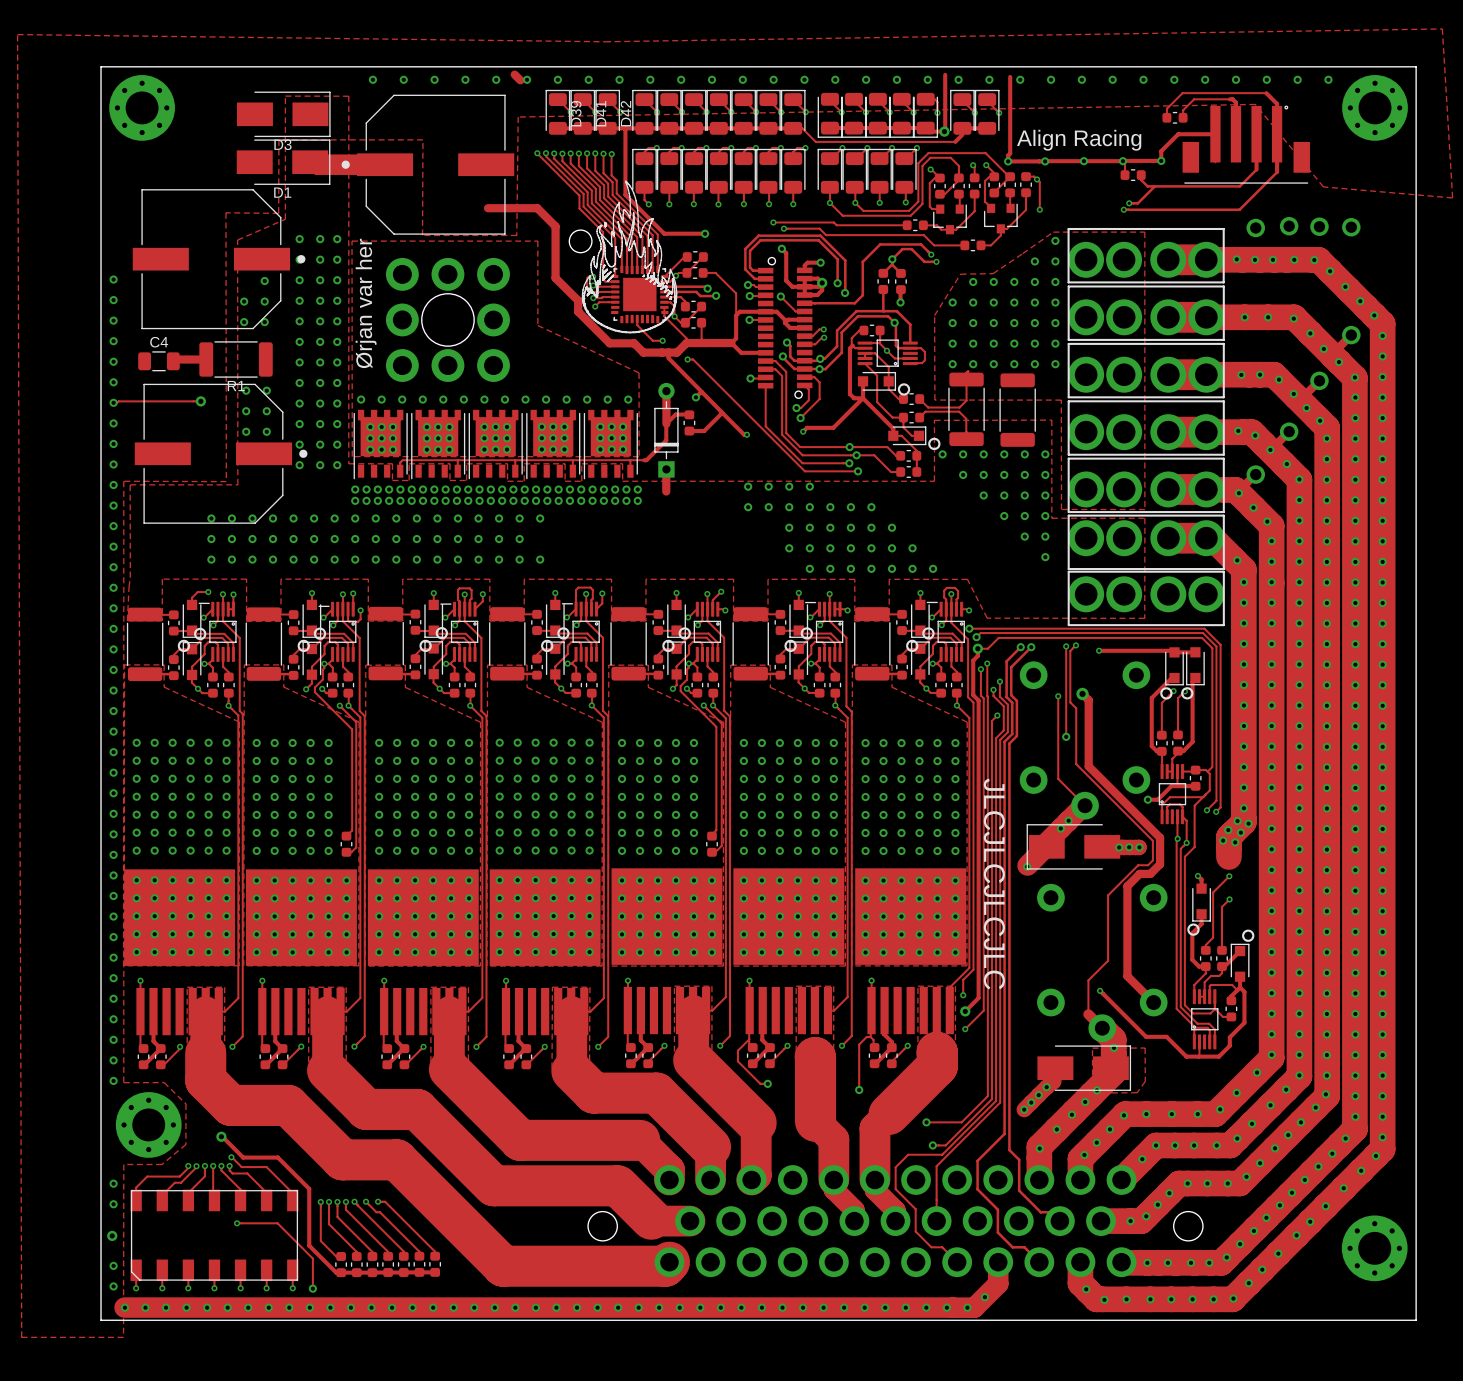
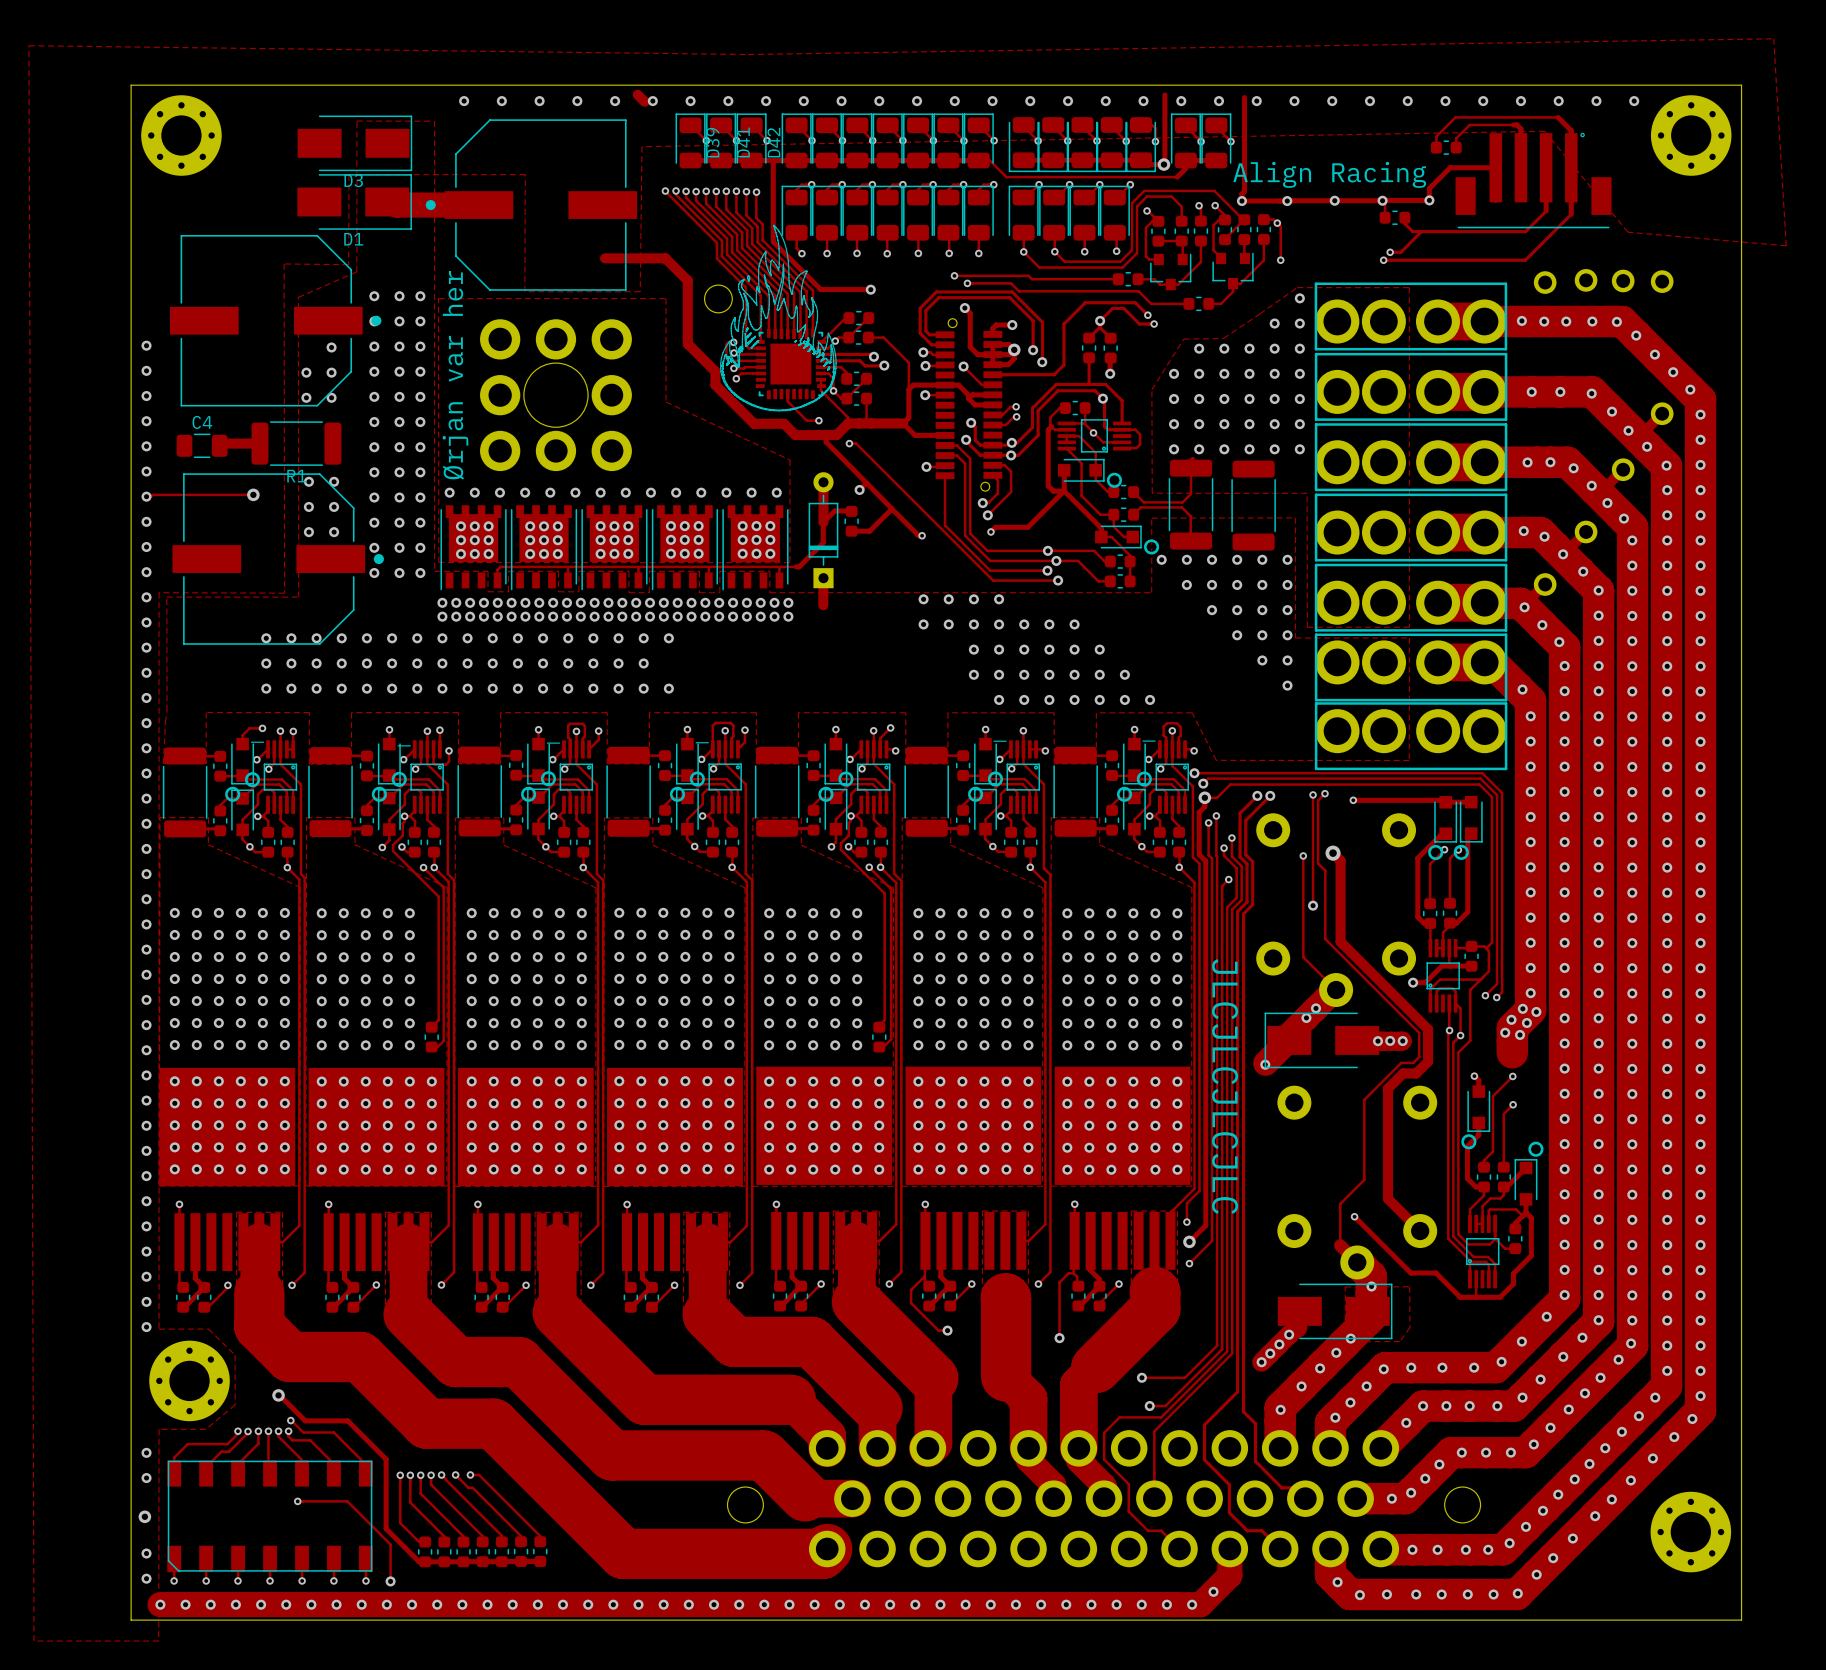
track: (958, 177) (944, 194) (939, 194) -> (1181, 241) (1158, 241)

